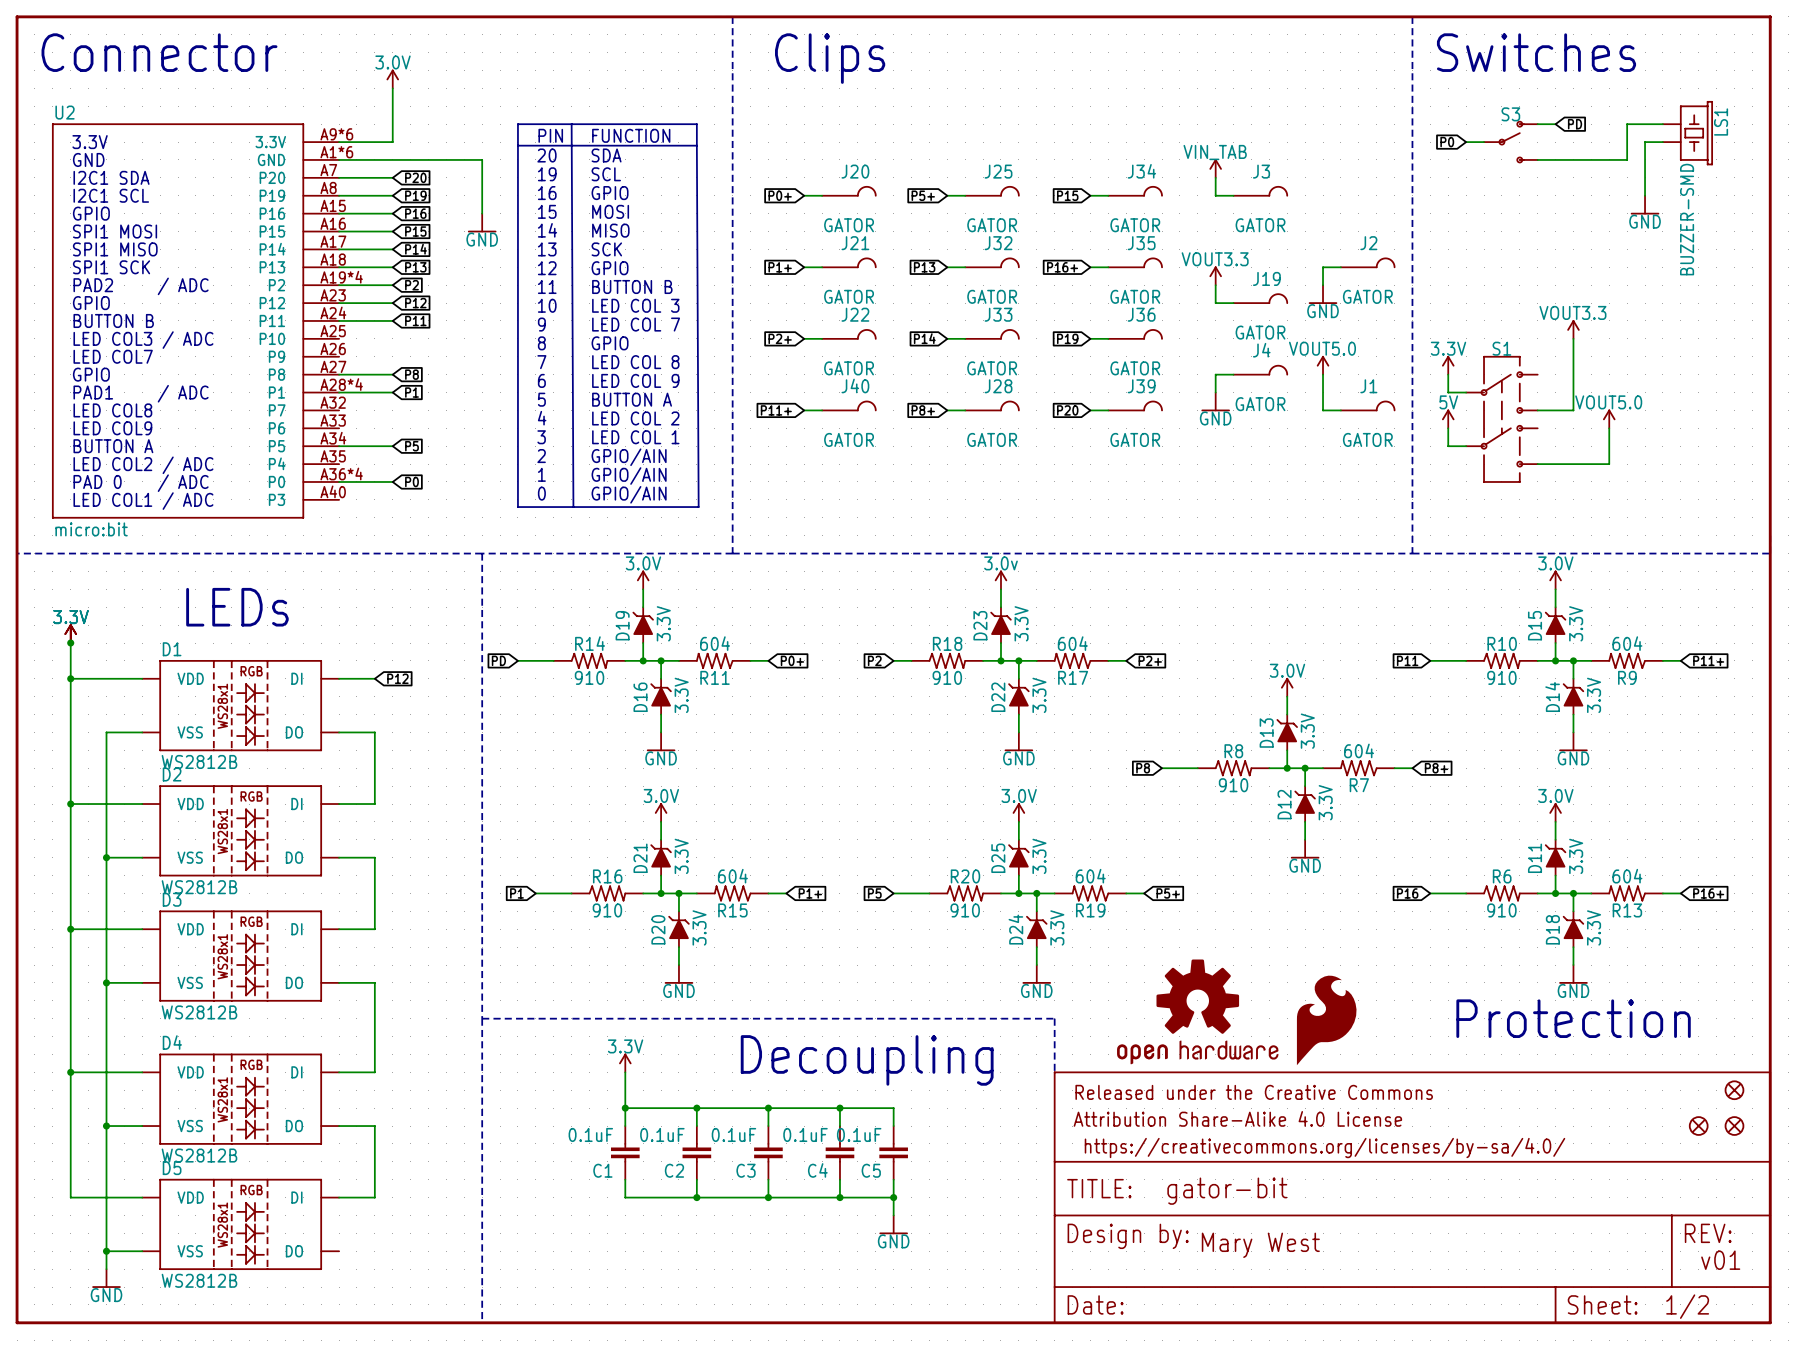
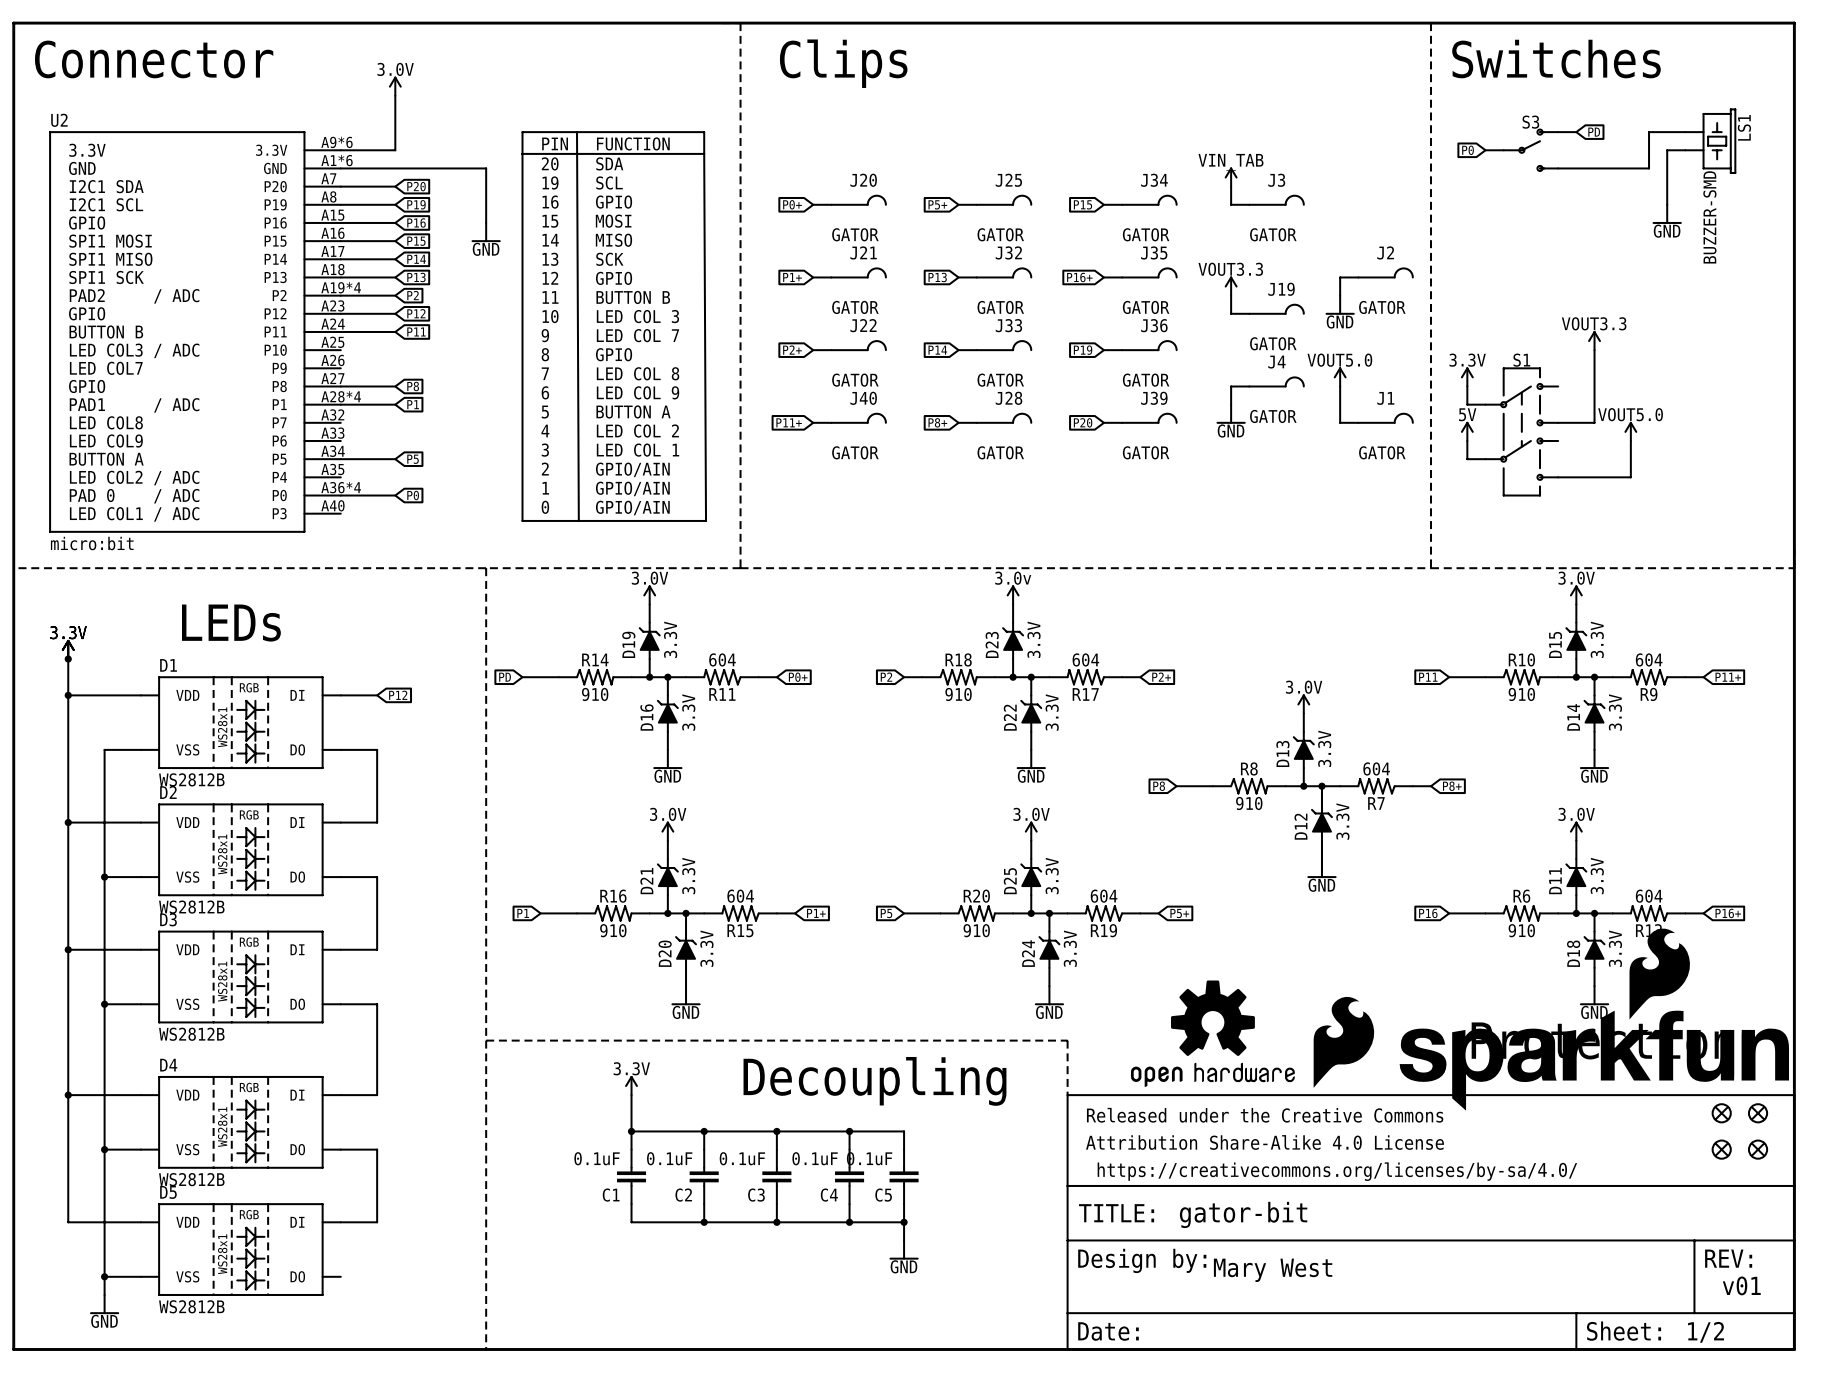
part: none -> (1594, 1019)
part: none -> (1721, 1113)

